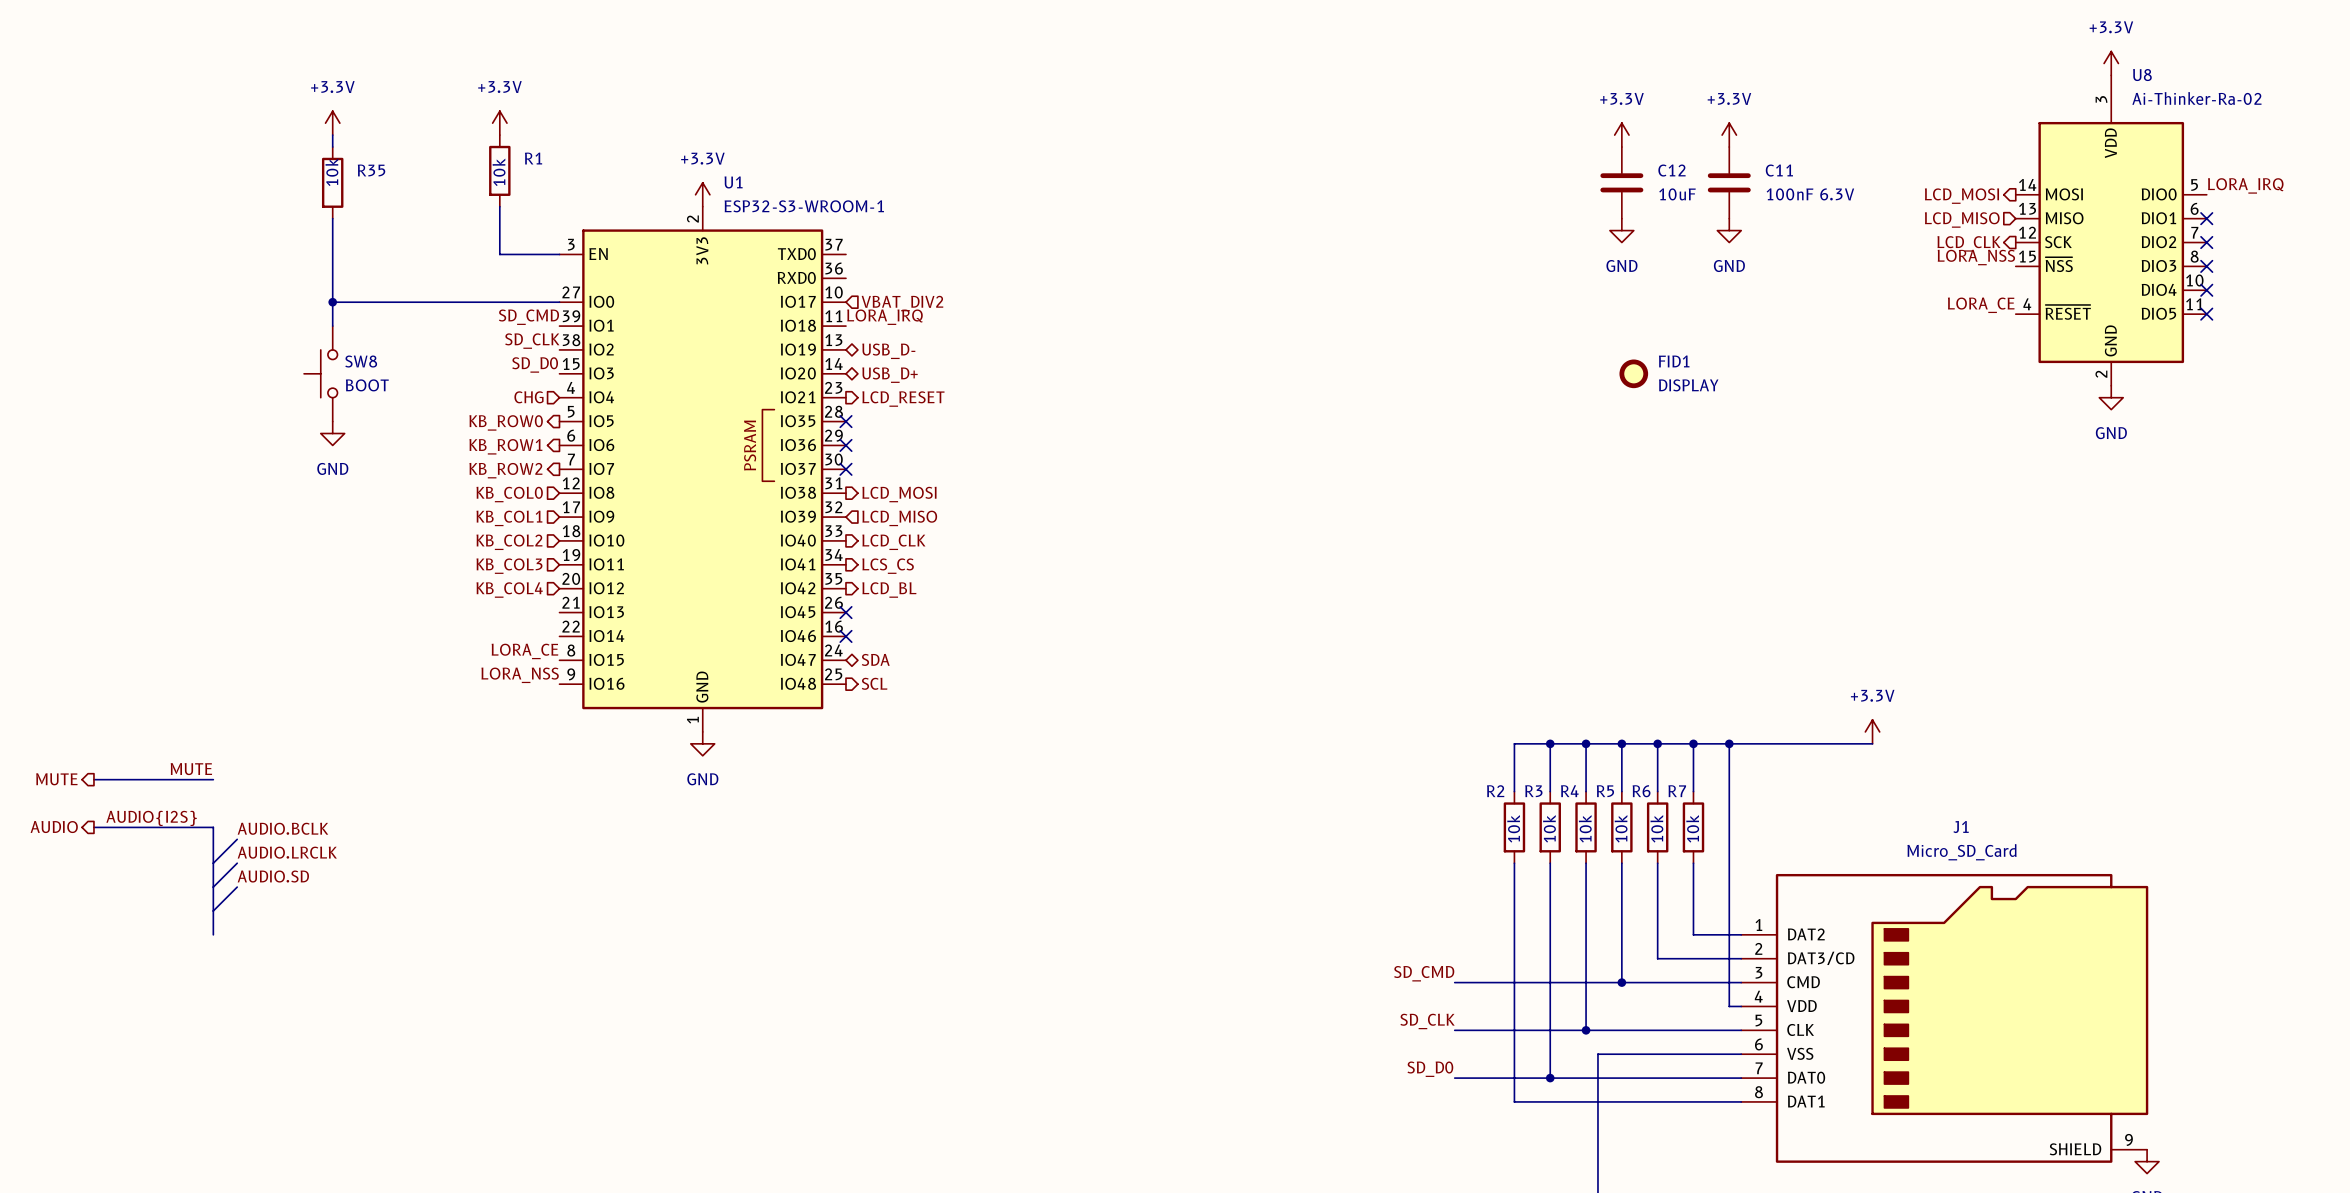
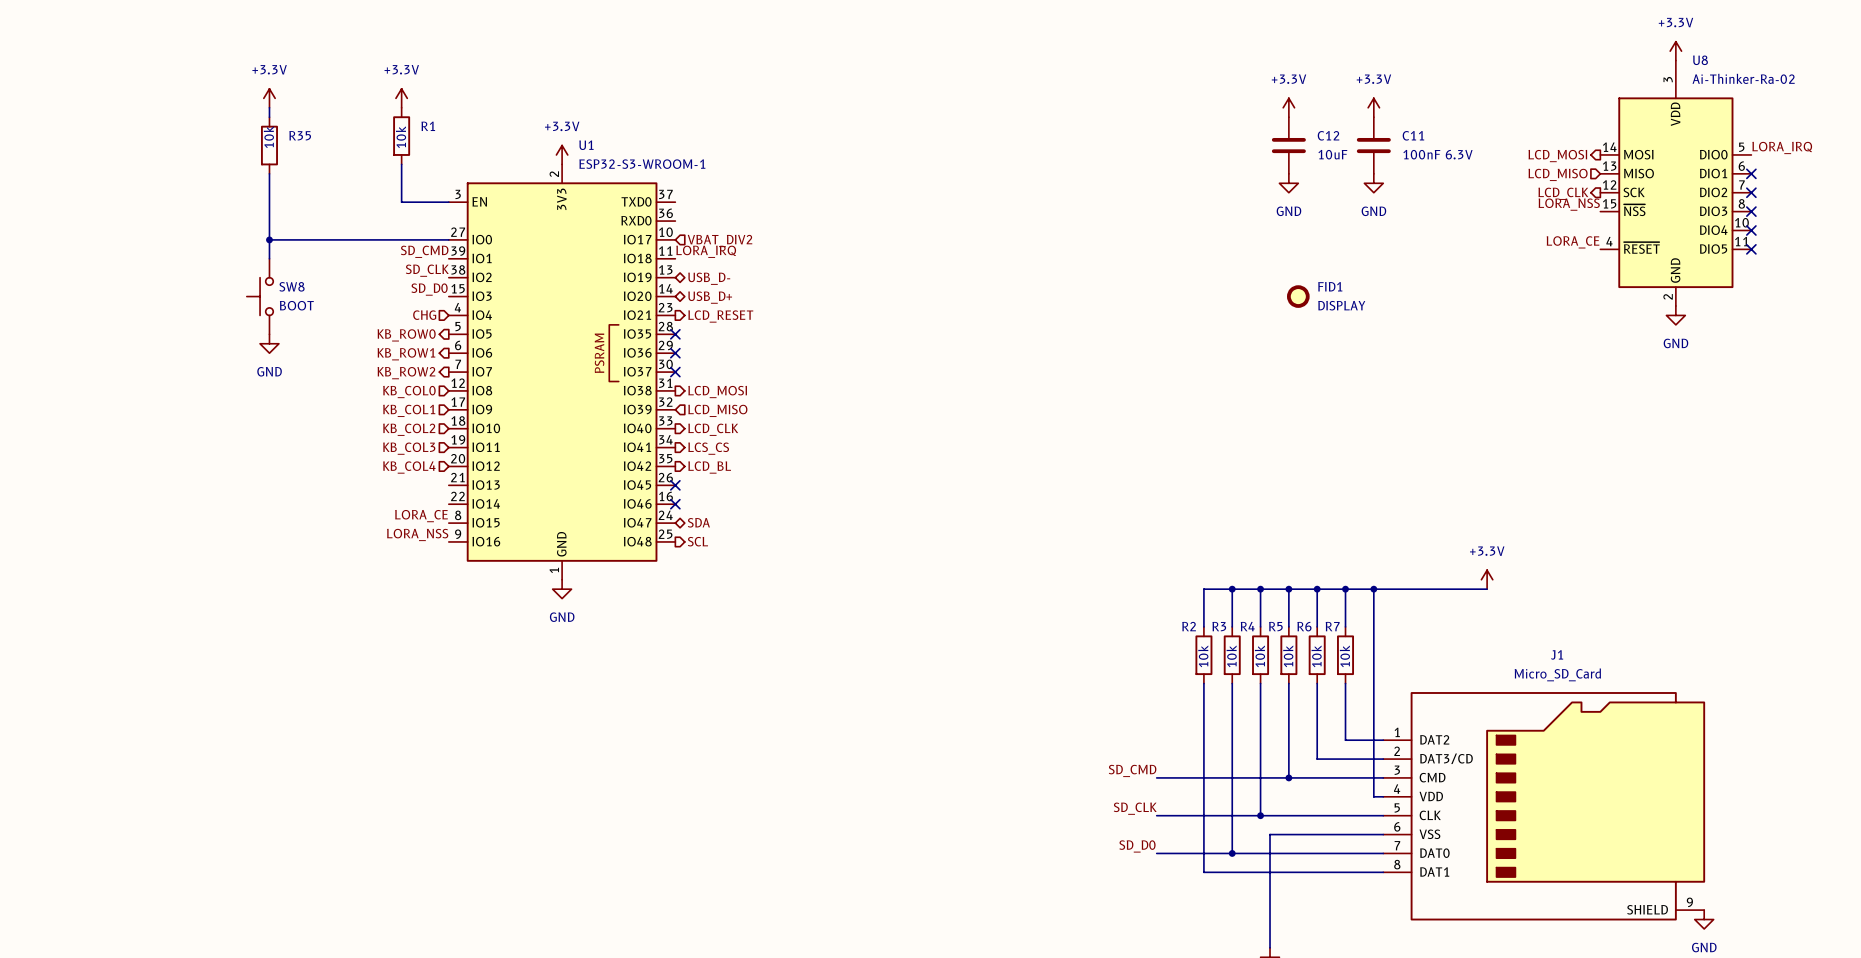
label: MUTE (191, 769) -> none
hierarchical label: MUTE (56, 779) -> none
wire: (93, 779) (213, 779) -> none
label: AUDIO{I2S} (151, 818) -> none
hierarchical label: AUDIO (54, 827) -> none
bus: (93, 827) (213, 827) (213, 934) -> none
label: AUDIO.BCLK (282, 828) -> none
wire: (237, 839) (213, 863) -> none
label: AUDIO.LRCLK (287, 852) -> none
wire: (237, 863) (213, 887) -> none
label: AUDIO.SD (273, 876) -> none
wire: (237, 887) (213, 910) -> none

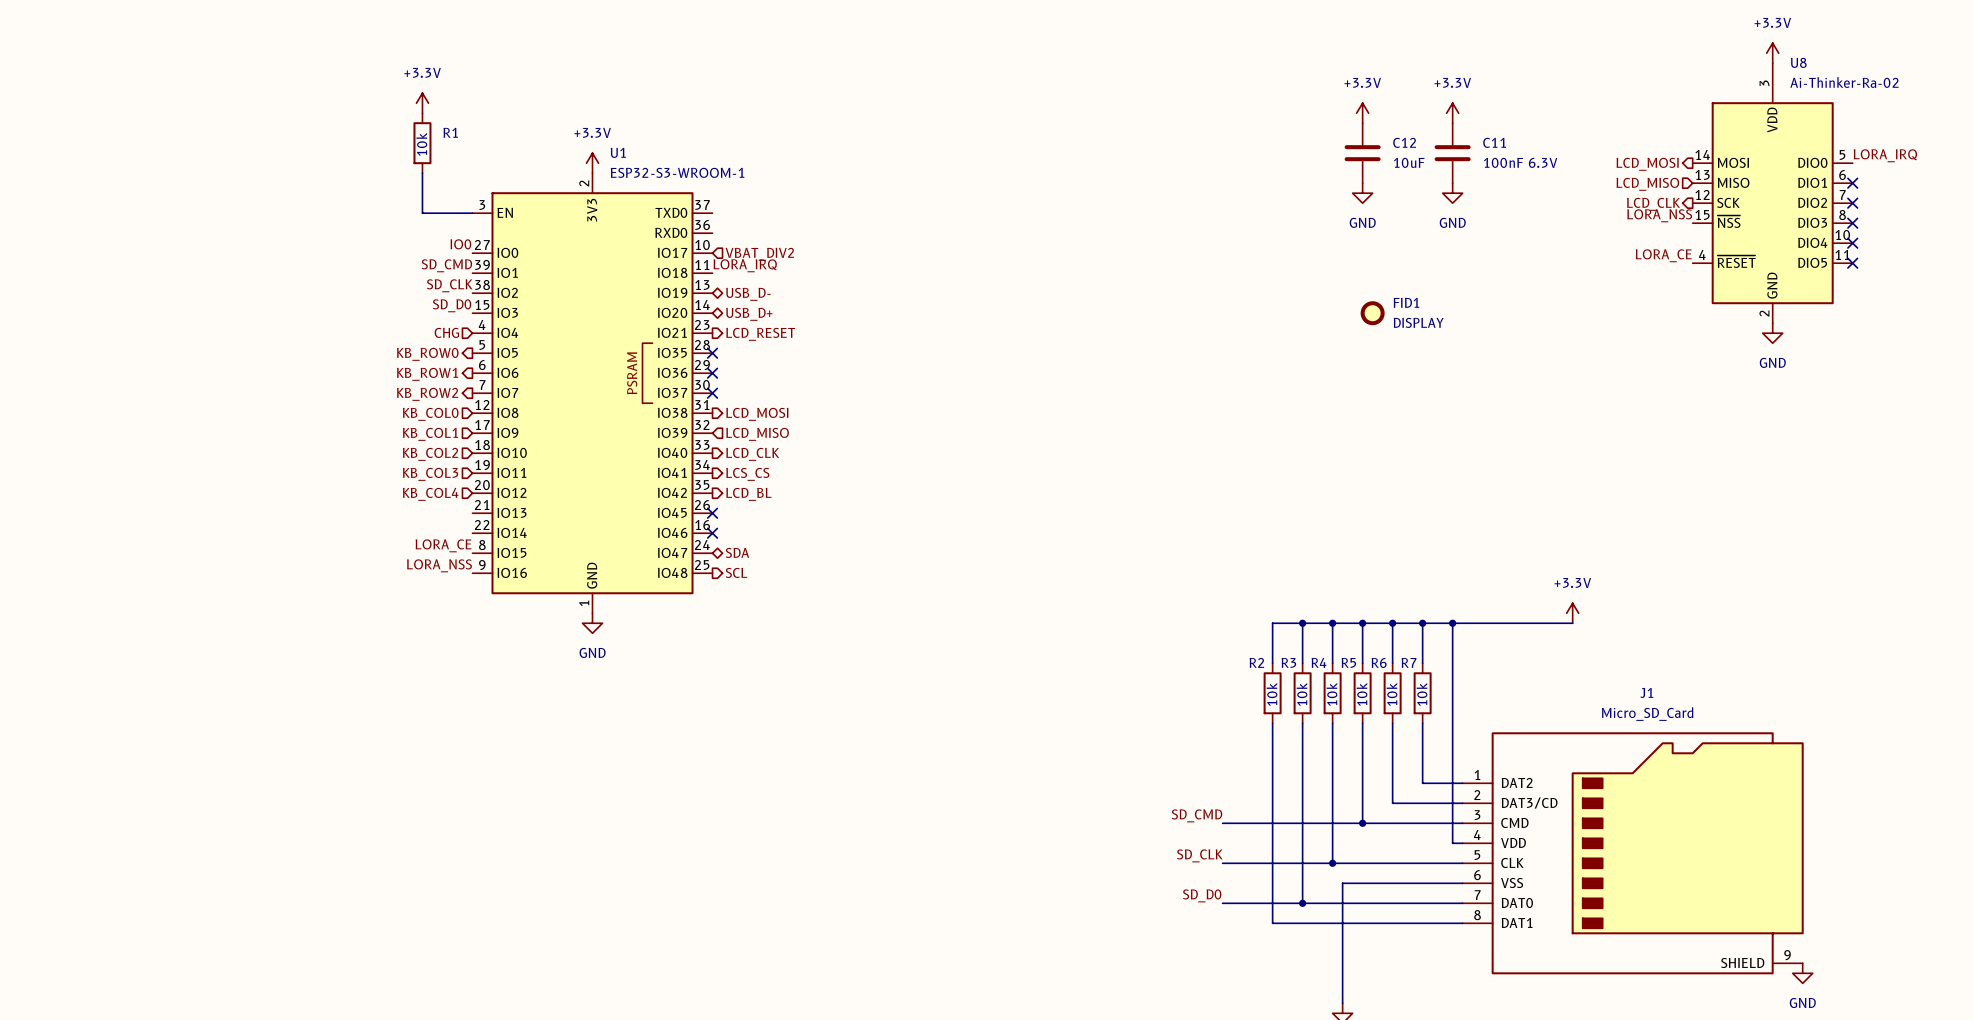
power symbol: +3.3V (269, 98) -> none
wire: (269, 107) (269, 117) -> none
R35: 10k (269, 145) -> none
wire: (269, 173) (269, 258) -> none
label: none -> IO0 (460, 244)
wire: (269, 239) (448, 239) -> none
junction: (269, 239) -> none
SW8: BOOT (260, 296) -> none
power symbol: GND (269, 343) -> none

